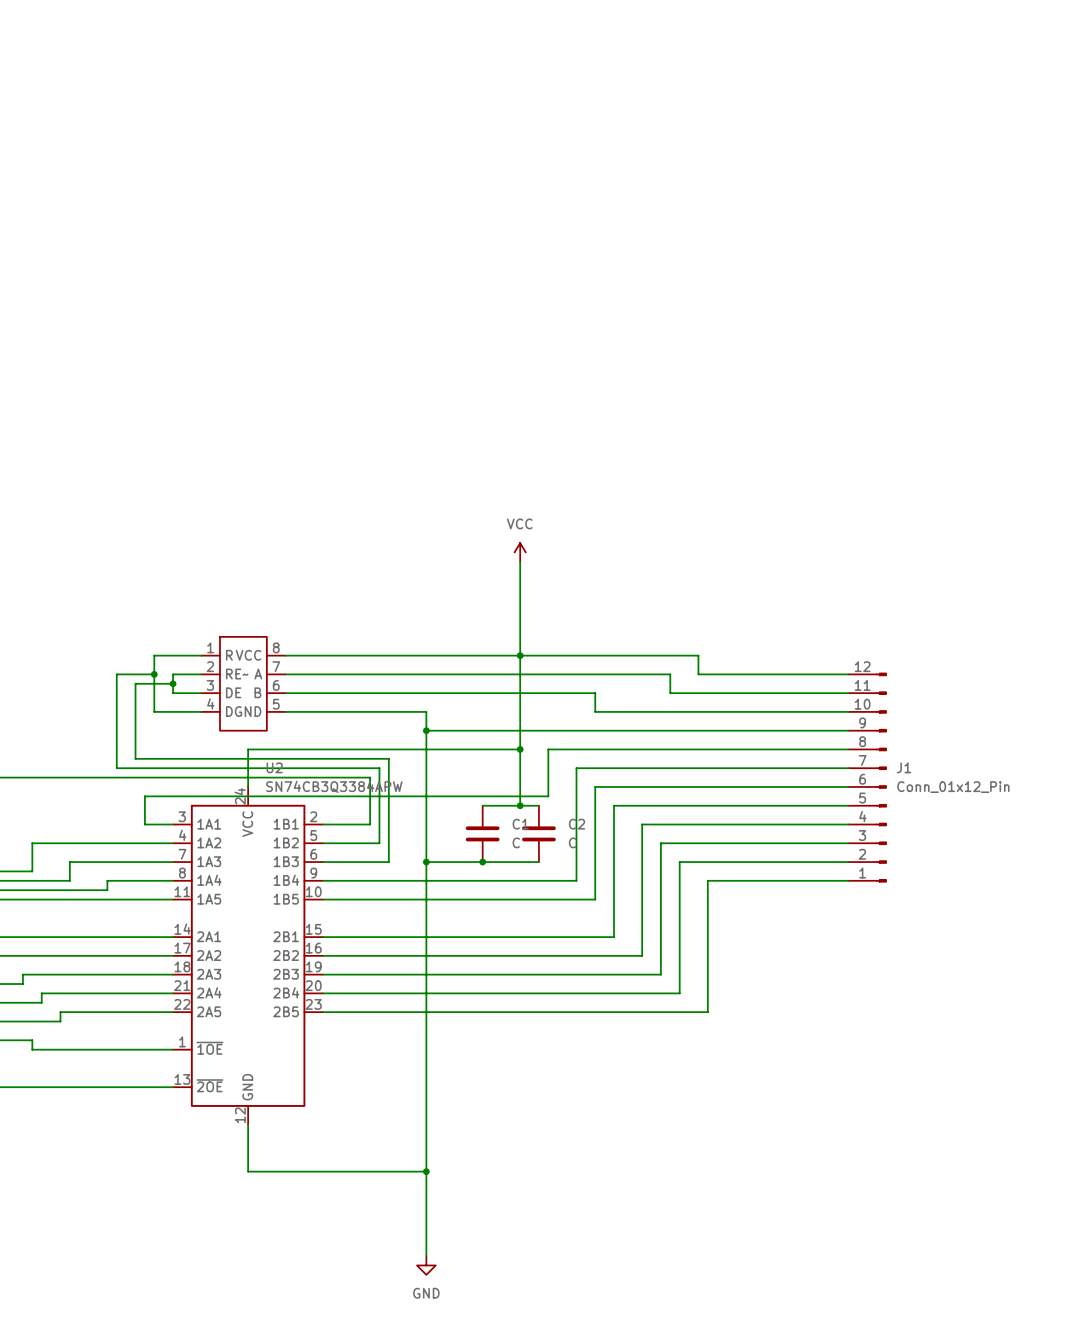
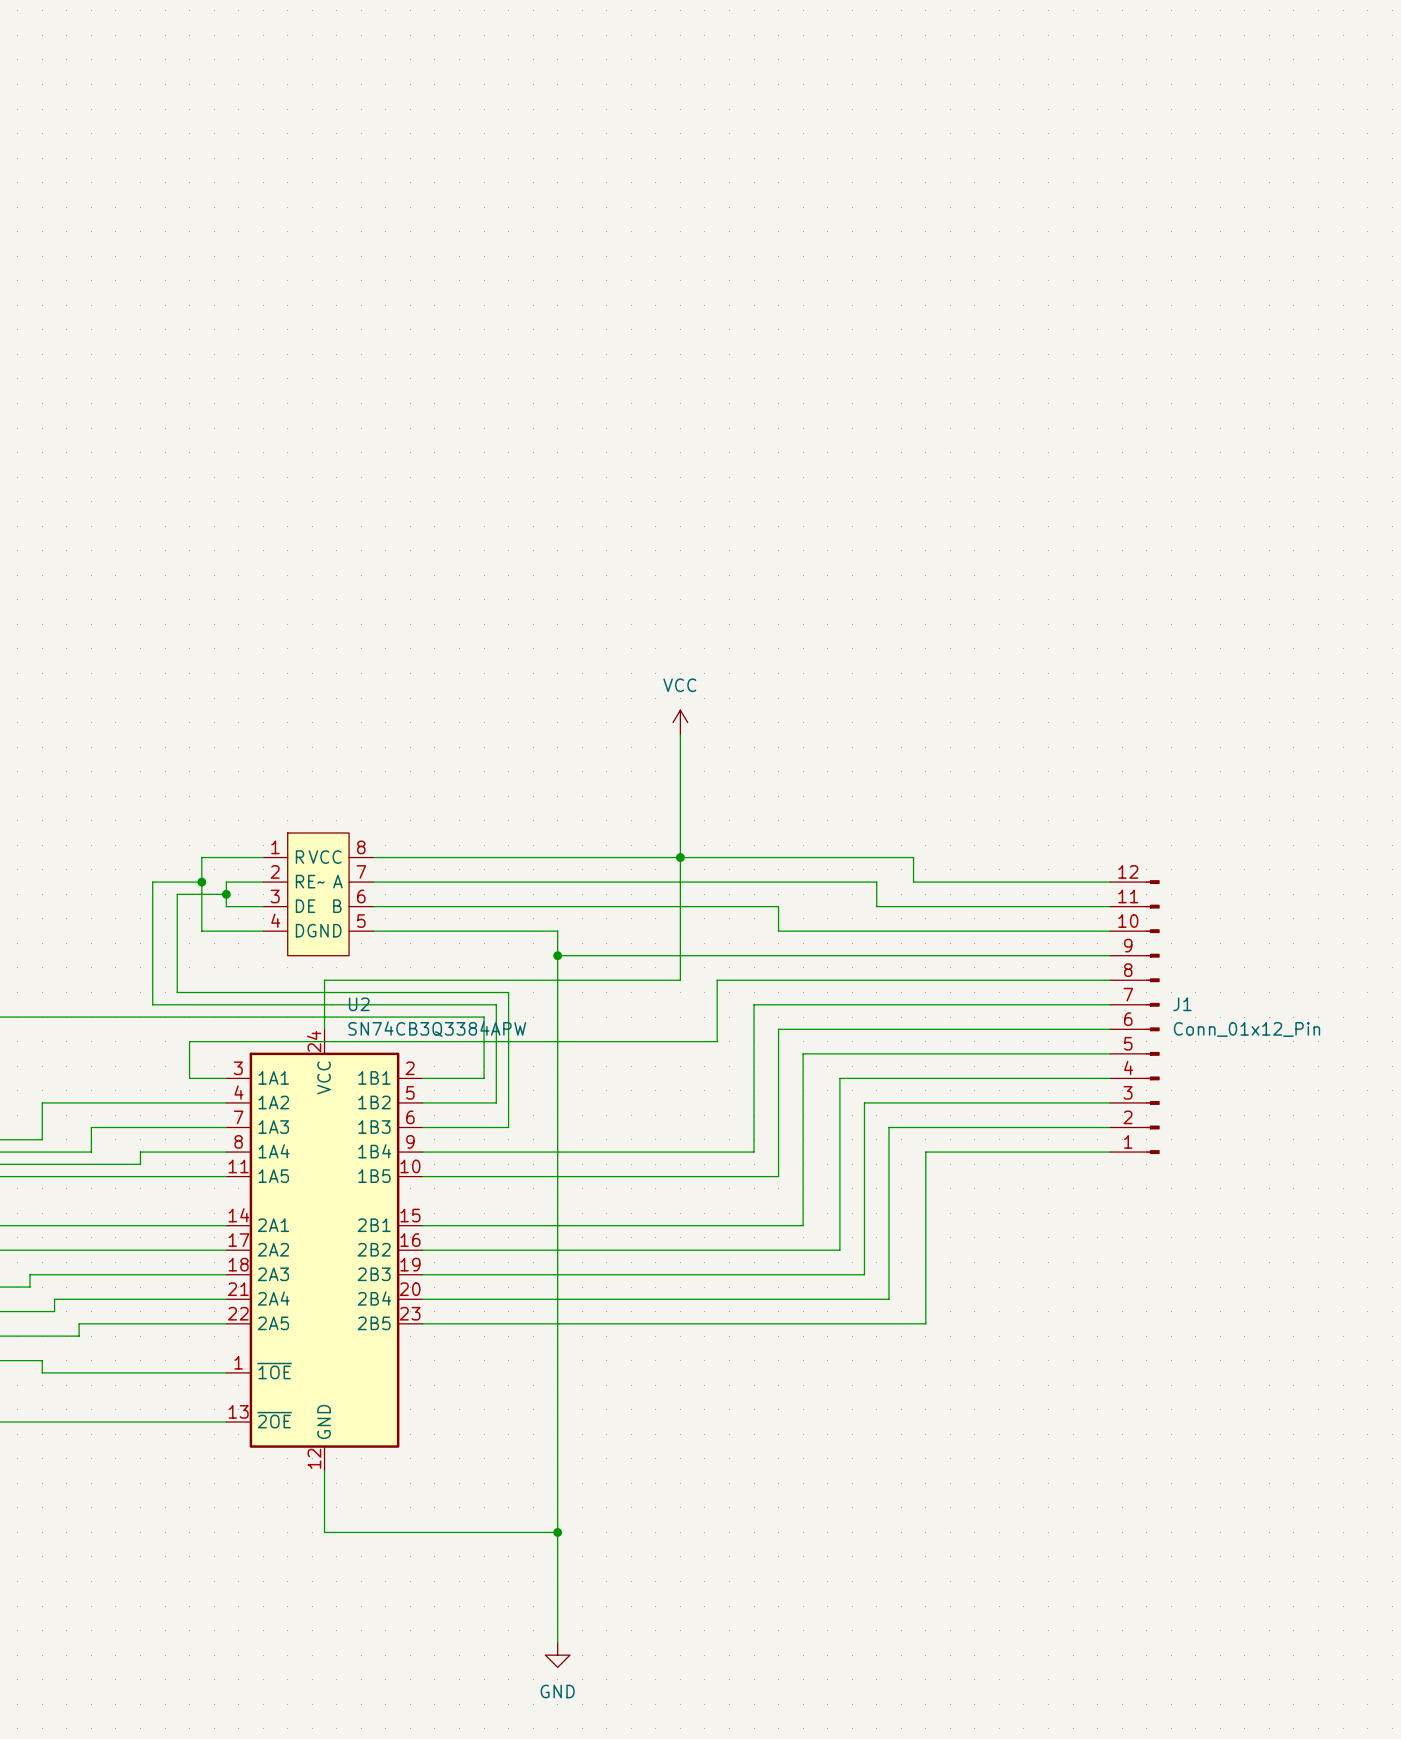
wire: (520, 749) (520, 805) -> none
junction: (520, 749) -> none
wire: (482, 805) (538, 805) -> none
junction: (520, 805) -> none
C1: C (482, 833) -> none
C2: C (538, 833) -> none
wire: (426, 862) (538, 862) -> none
junction: (426, 862) -> none
junction: (482, 862) -> none

